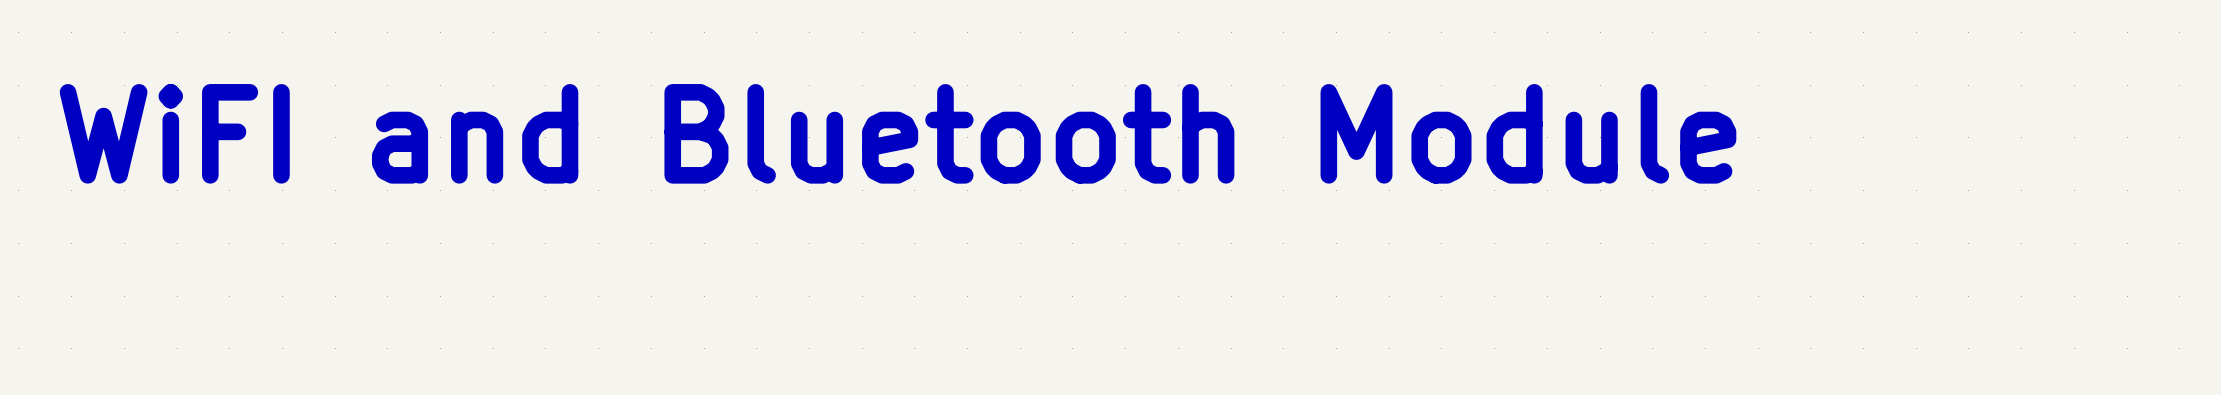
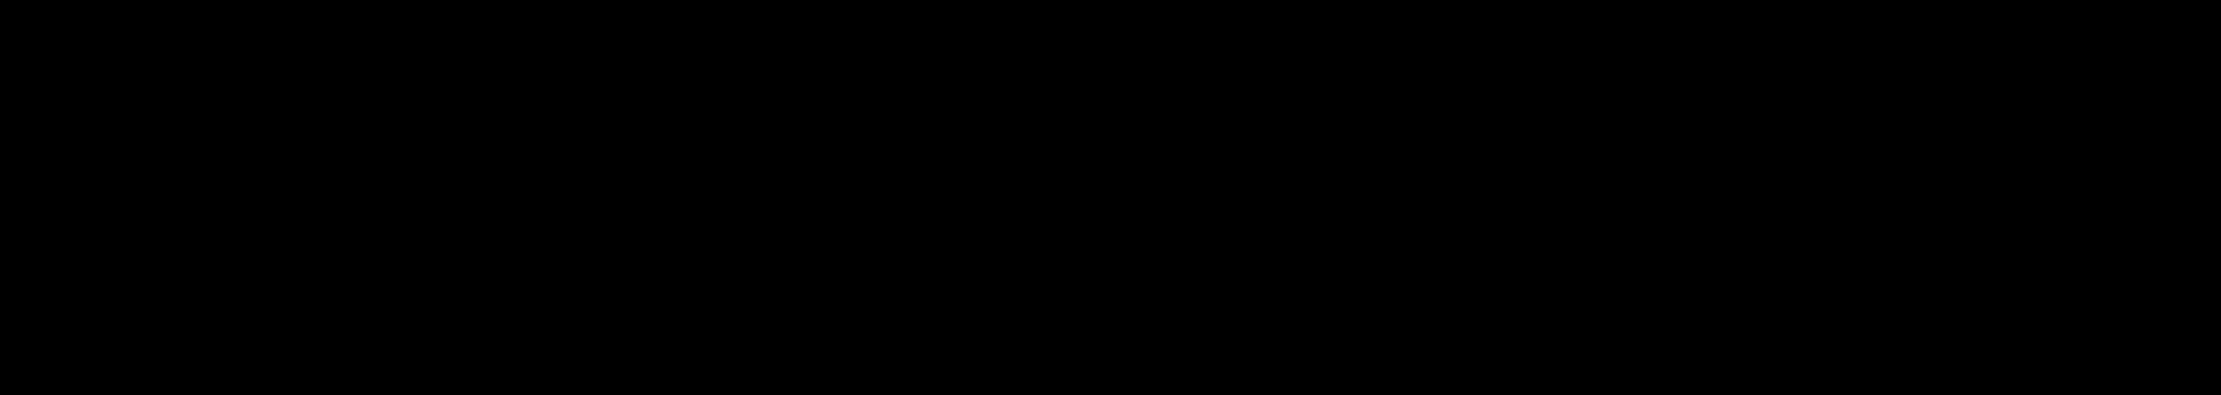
text: WiFI and Bluetooth Module (898, 133) -> none

